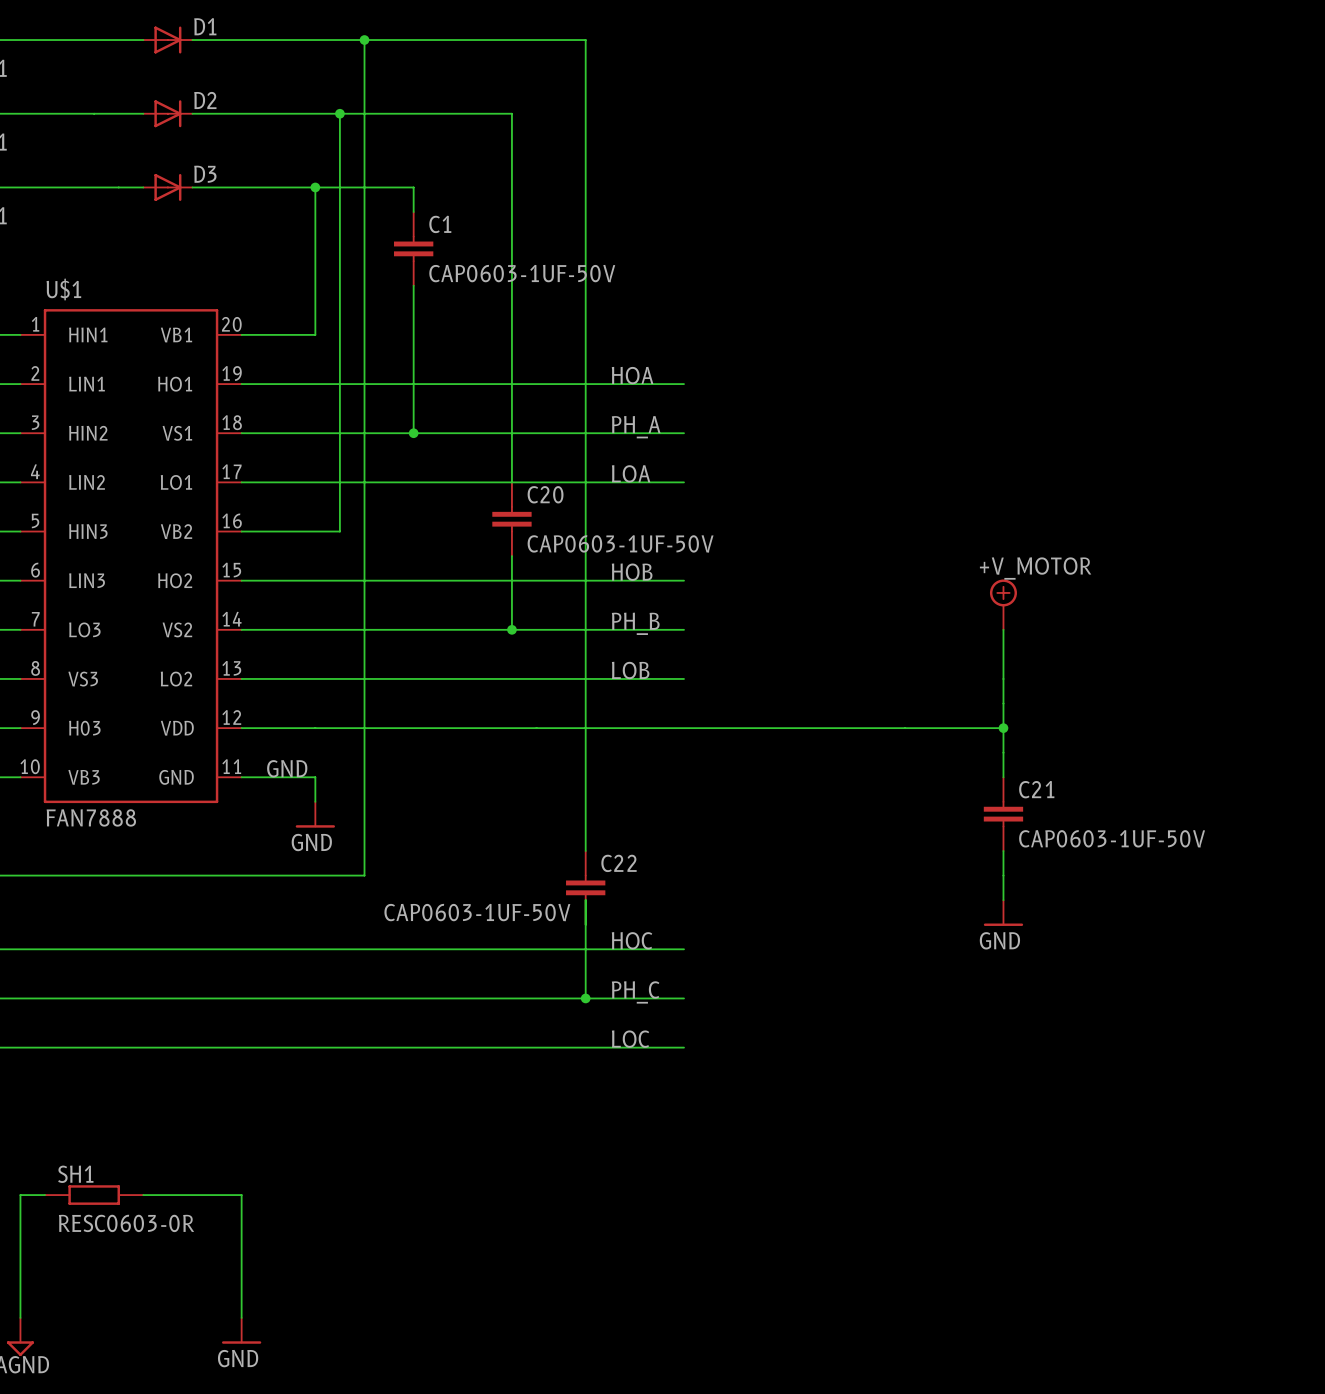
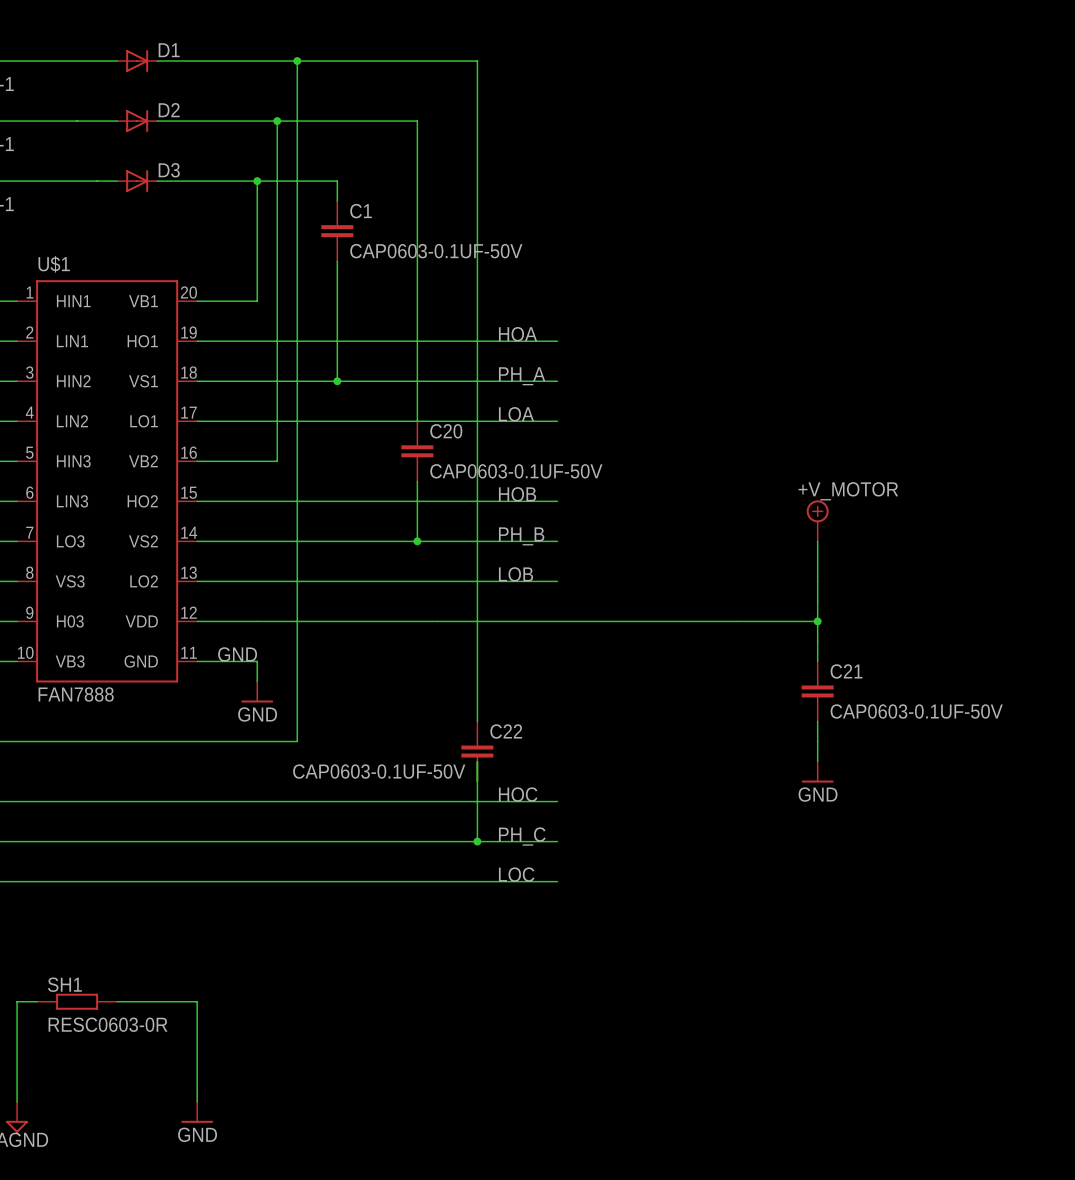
C1 value: CAP0603-1UF-50V (522, 273) -> CAP0603-0.1UF-50V (436, 251)
C20 value: CAP0603-1UF-50V (620, 543) -> CAP0603-0.1UF-50V (516, 471)
C21 value: CAP0603-1UF-50V (1112, 838) -> CAP0603-0.1UF-50V (916, 711)
C22 value: CAP0603-1UF-50V (477, 912) -> CAP0603-0.1UF-50V (379, 771)

